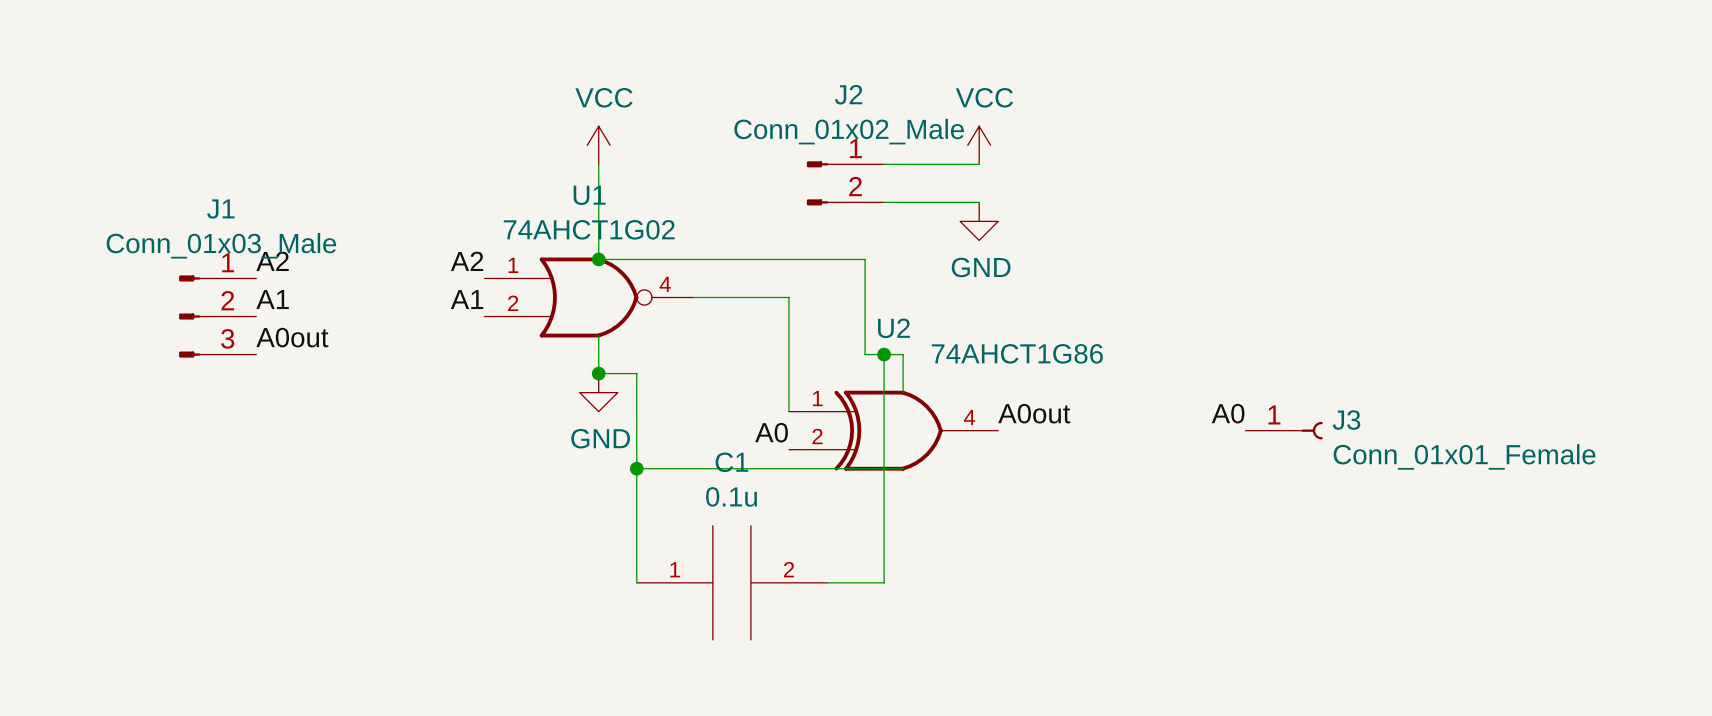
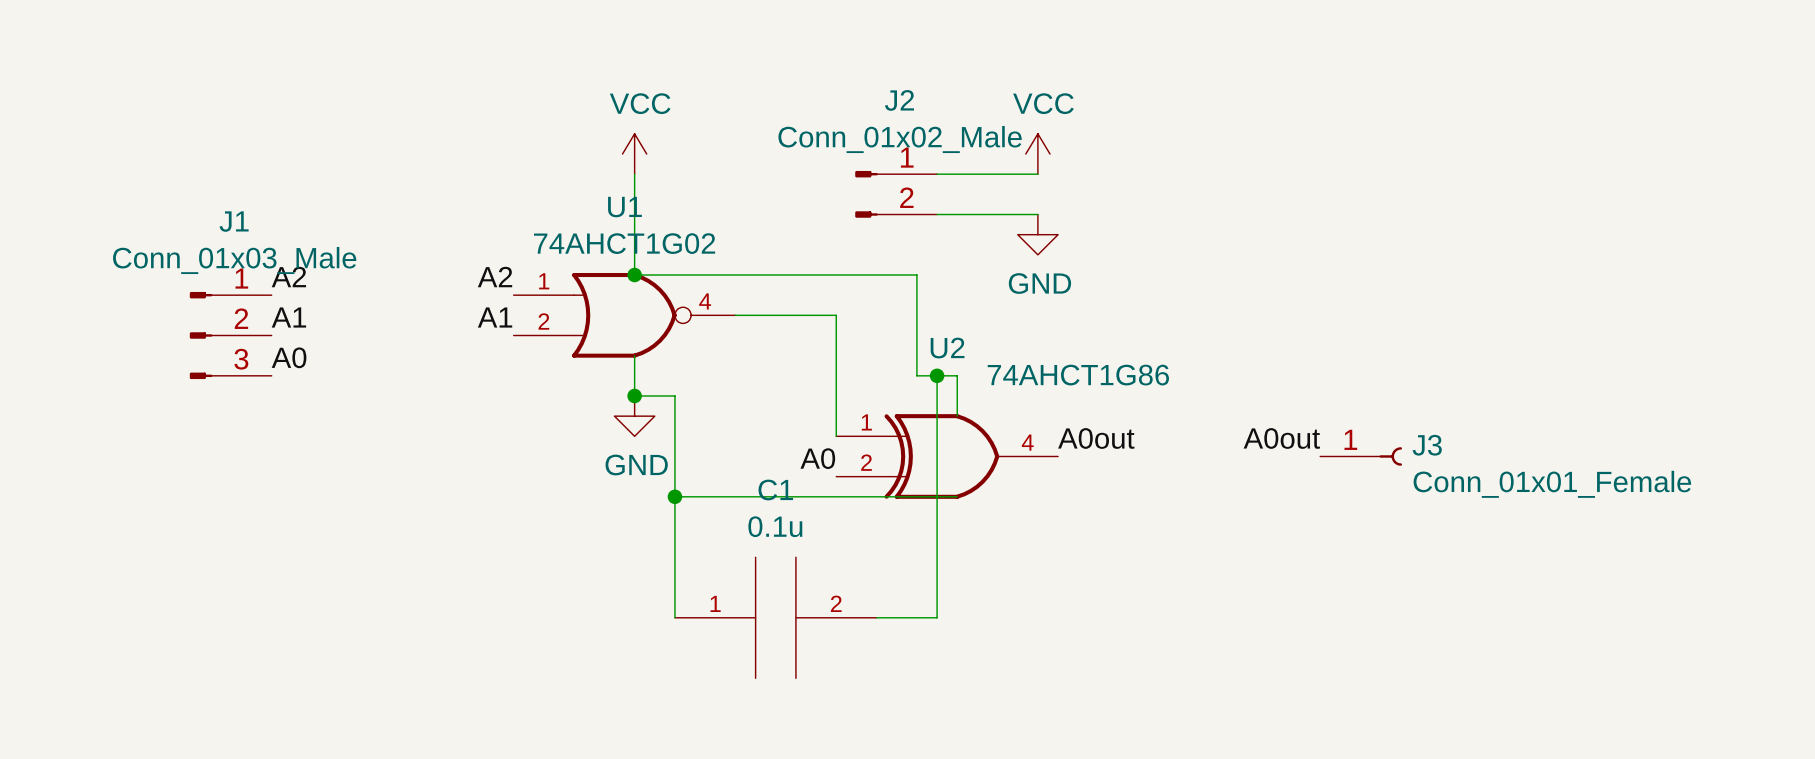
label: A0out (292, 337) -> A0 (289, 357)
label: A0 (1228, 413) -> A0out (1281, 438)

